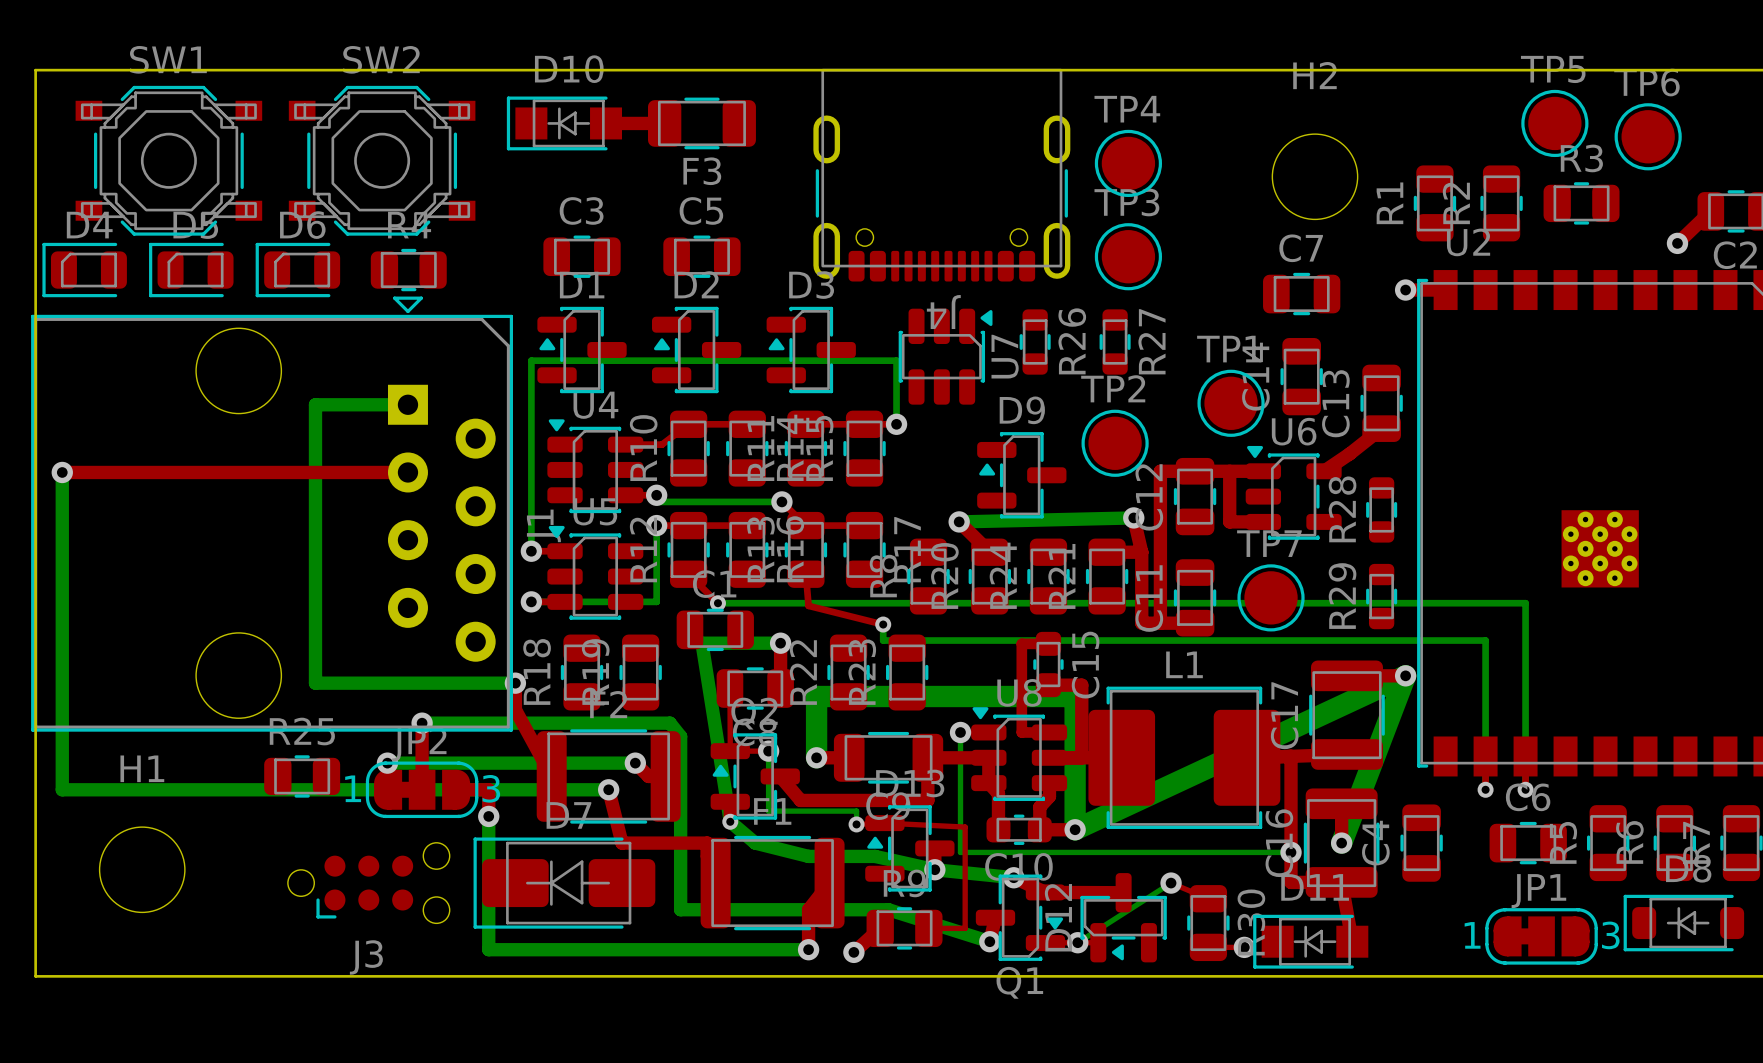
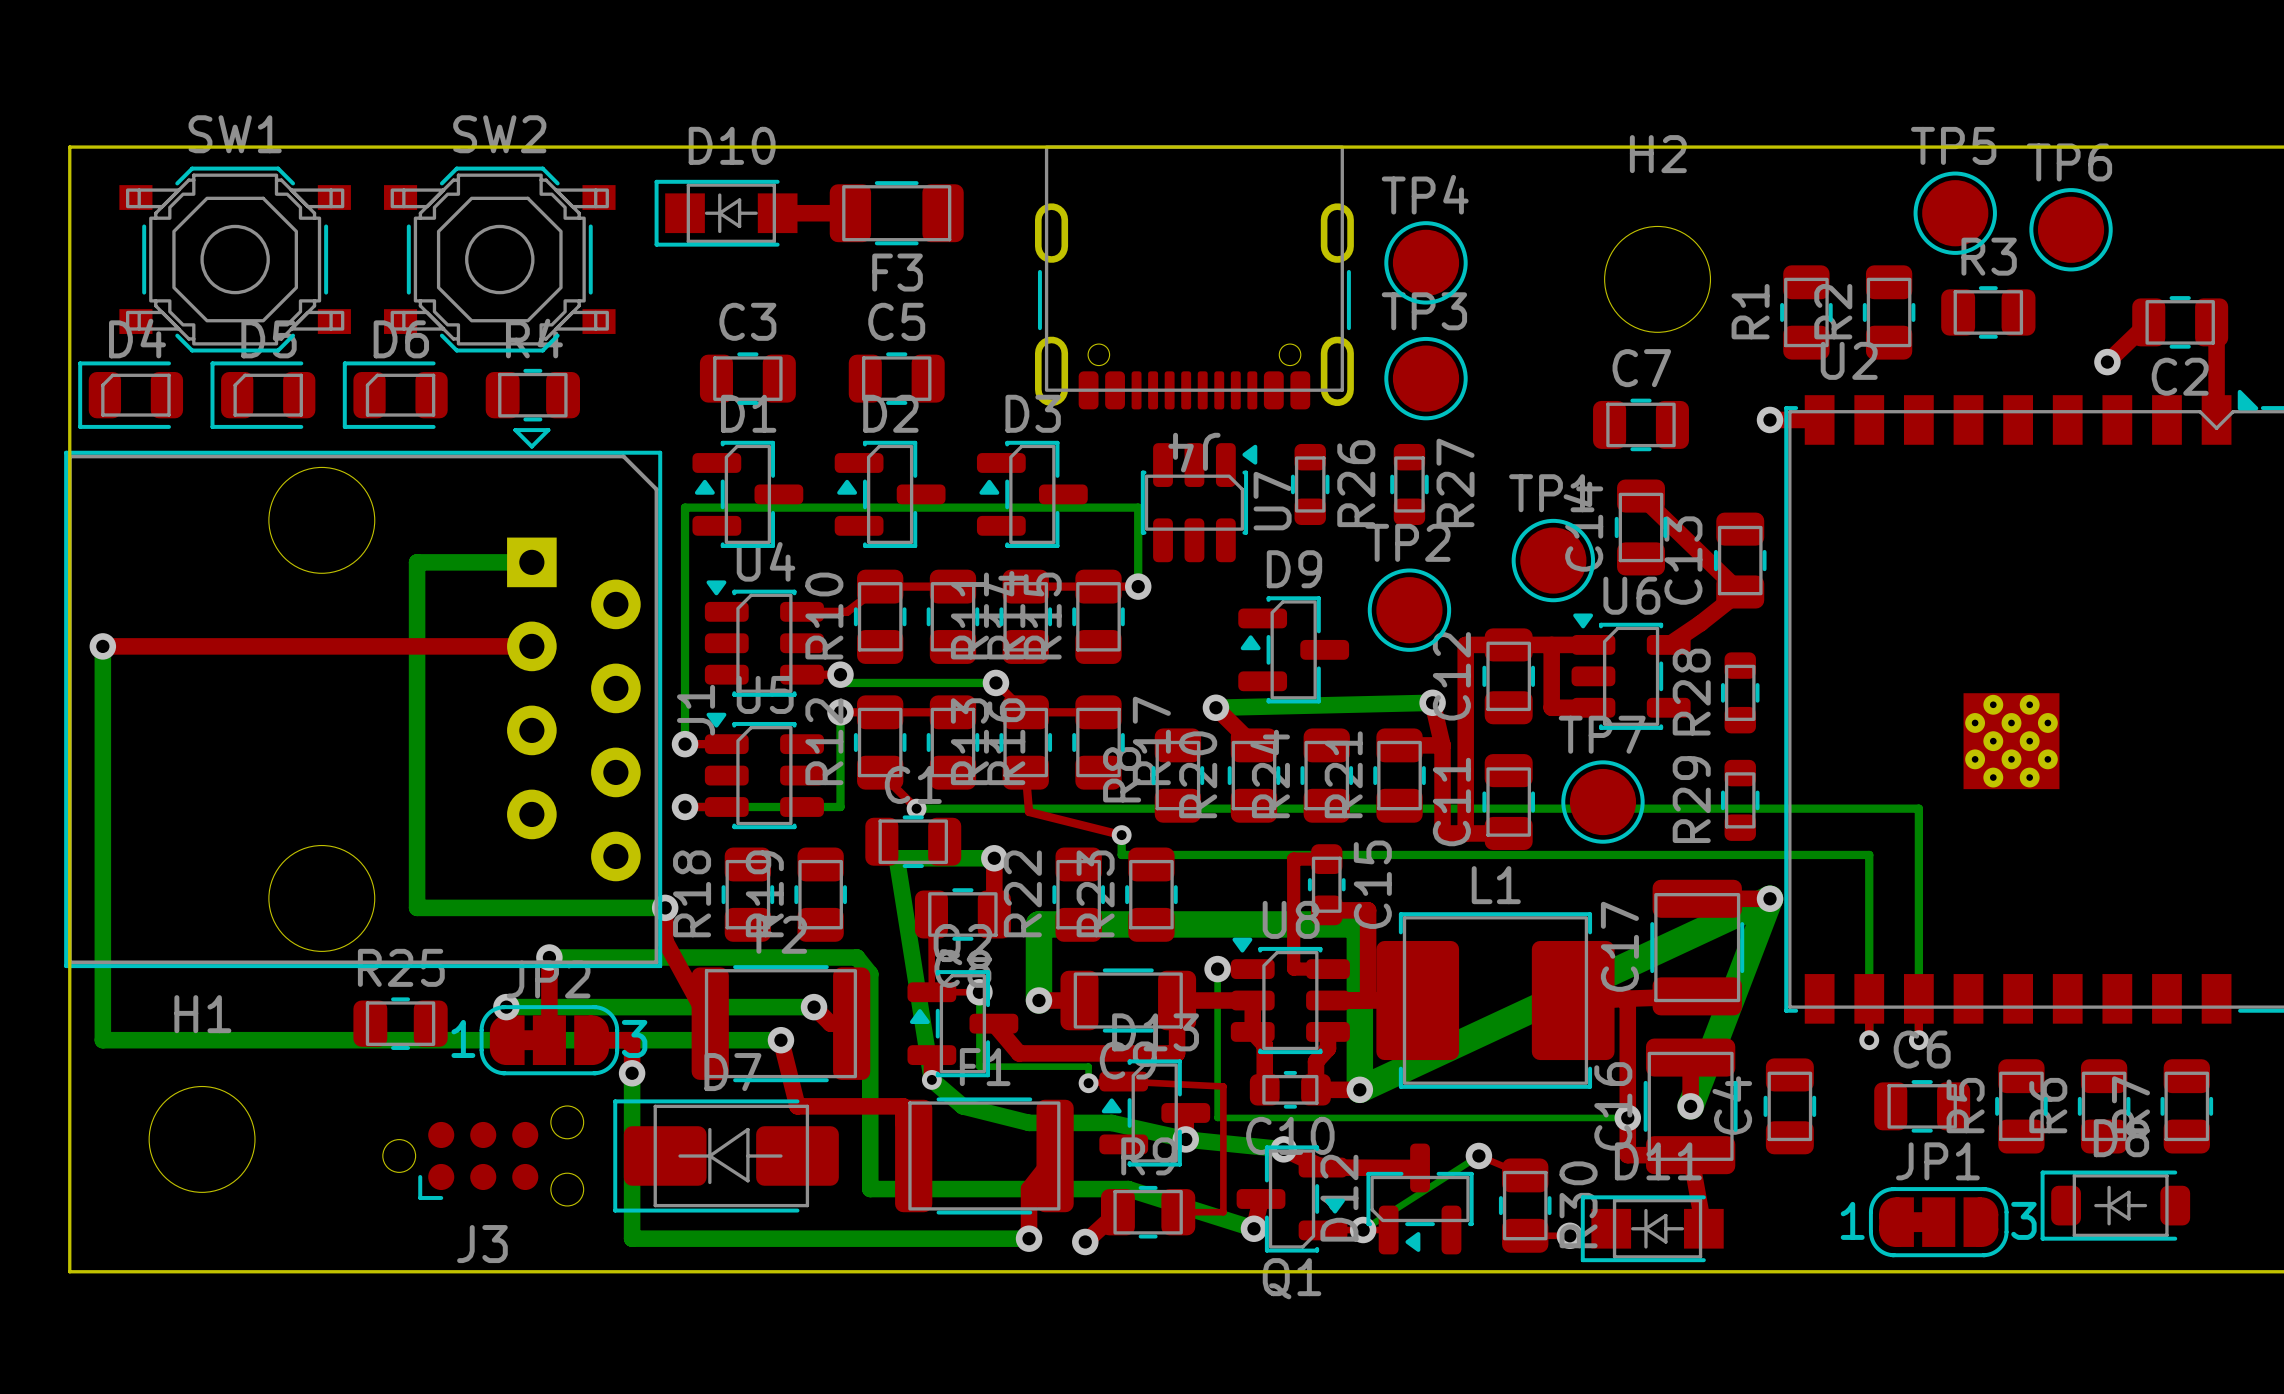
top track: none -> (1641, 496) (1740, 591)

